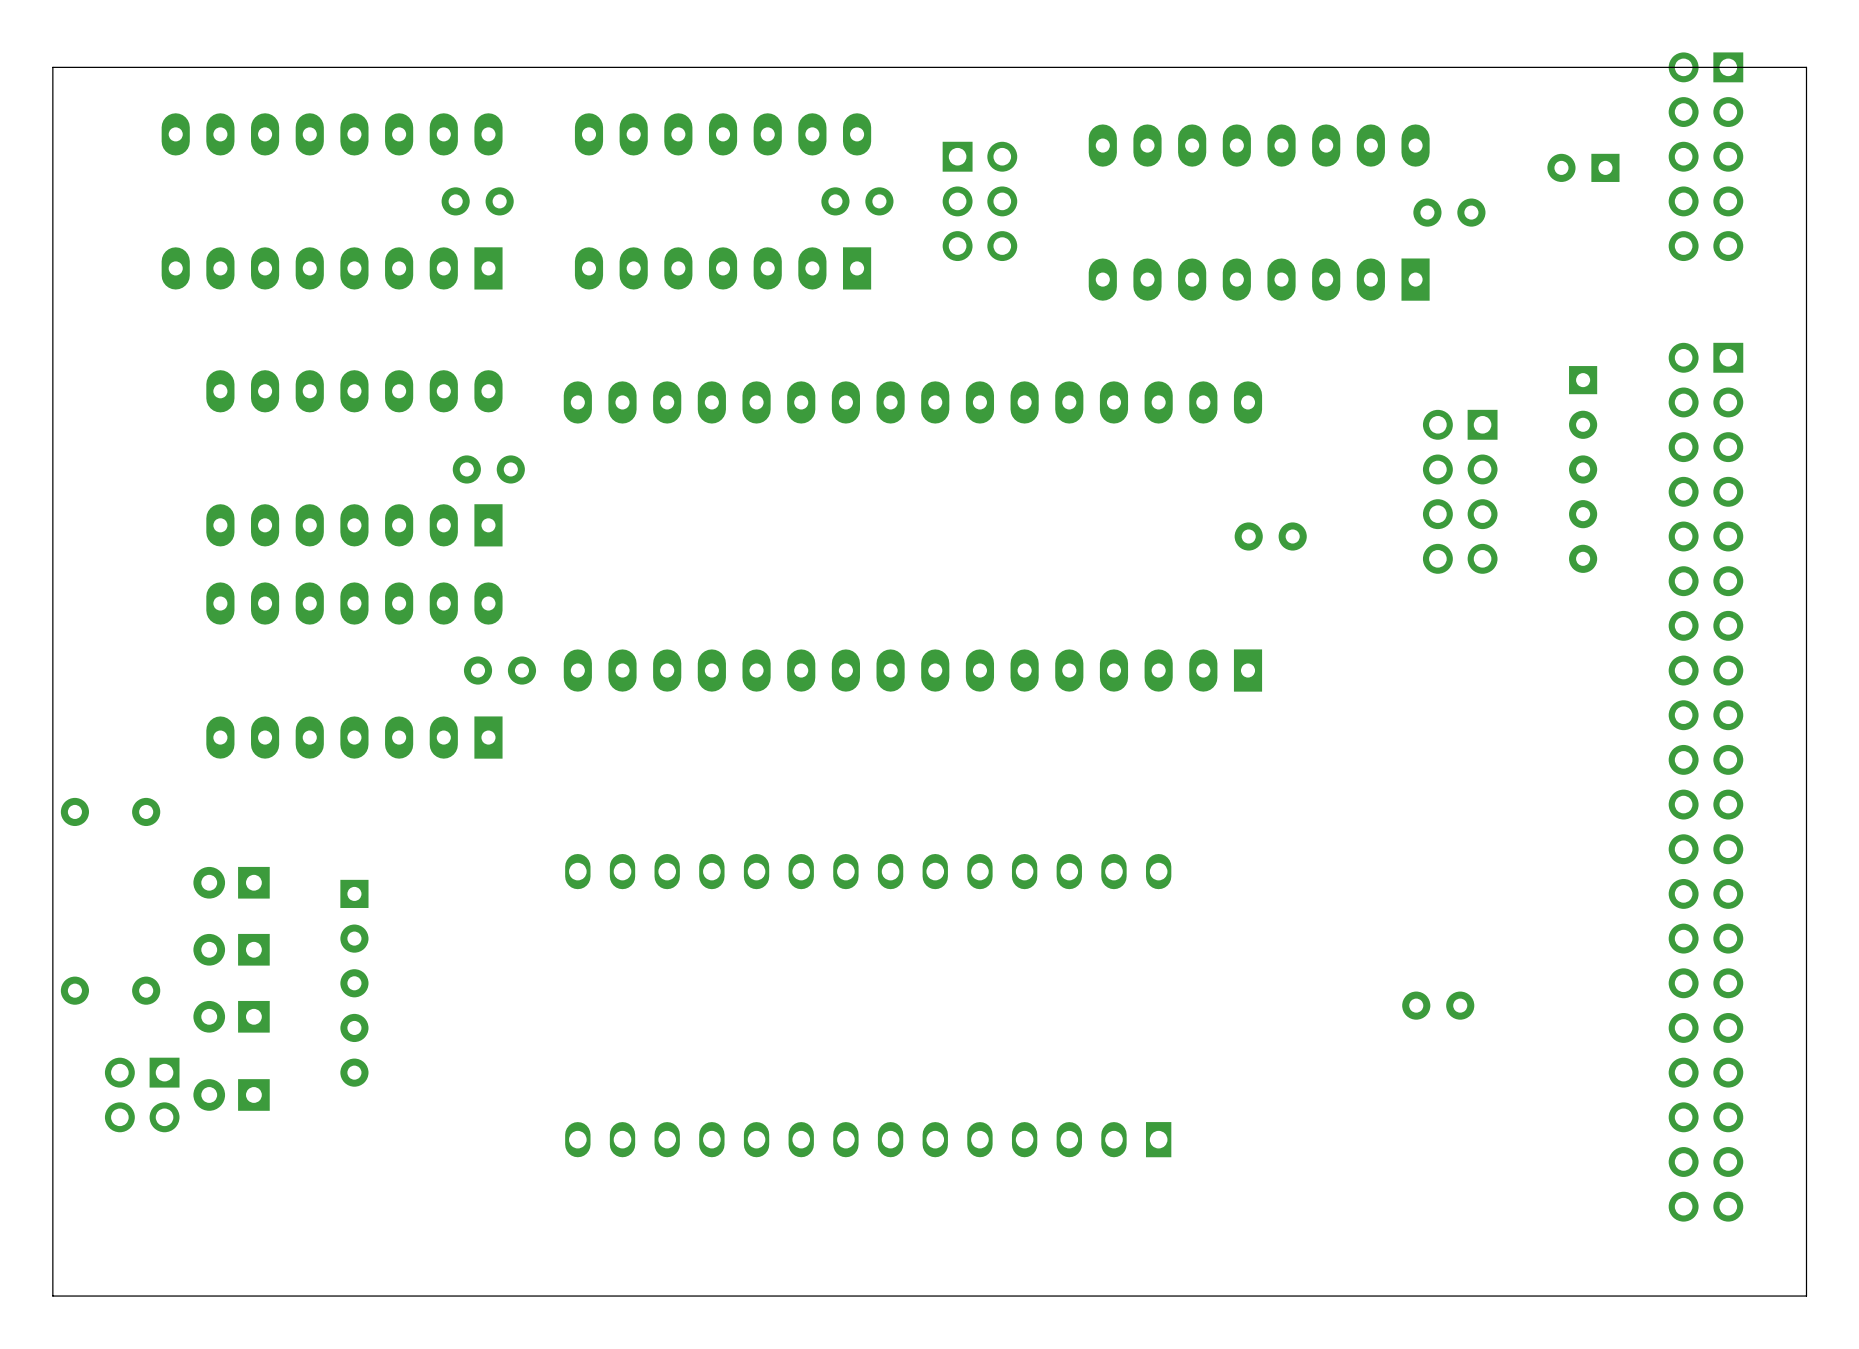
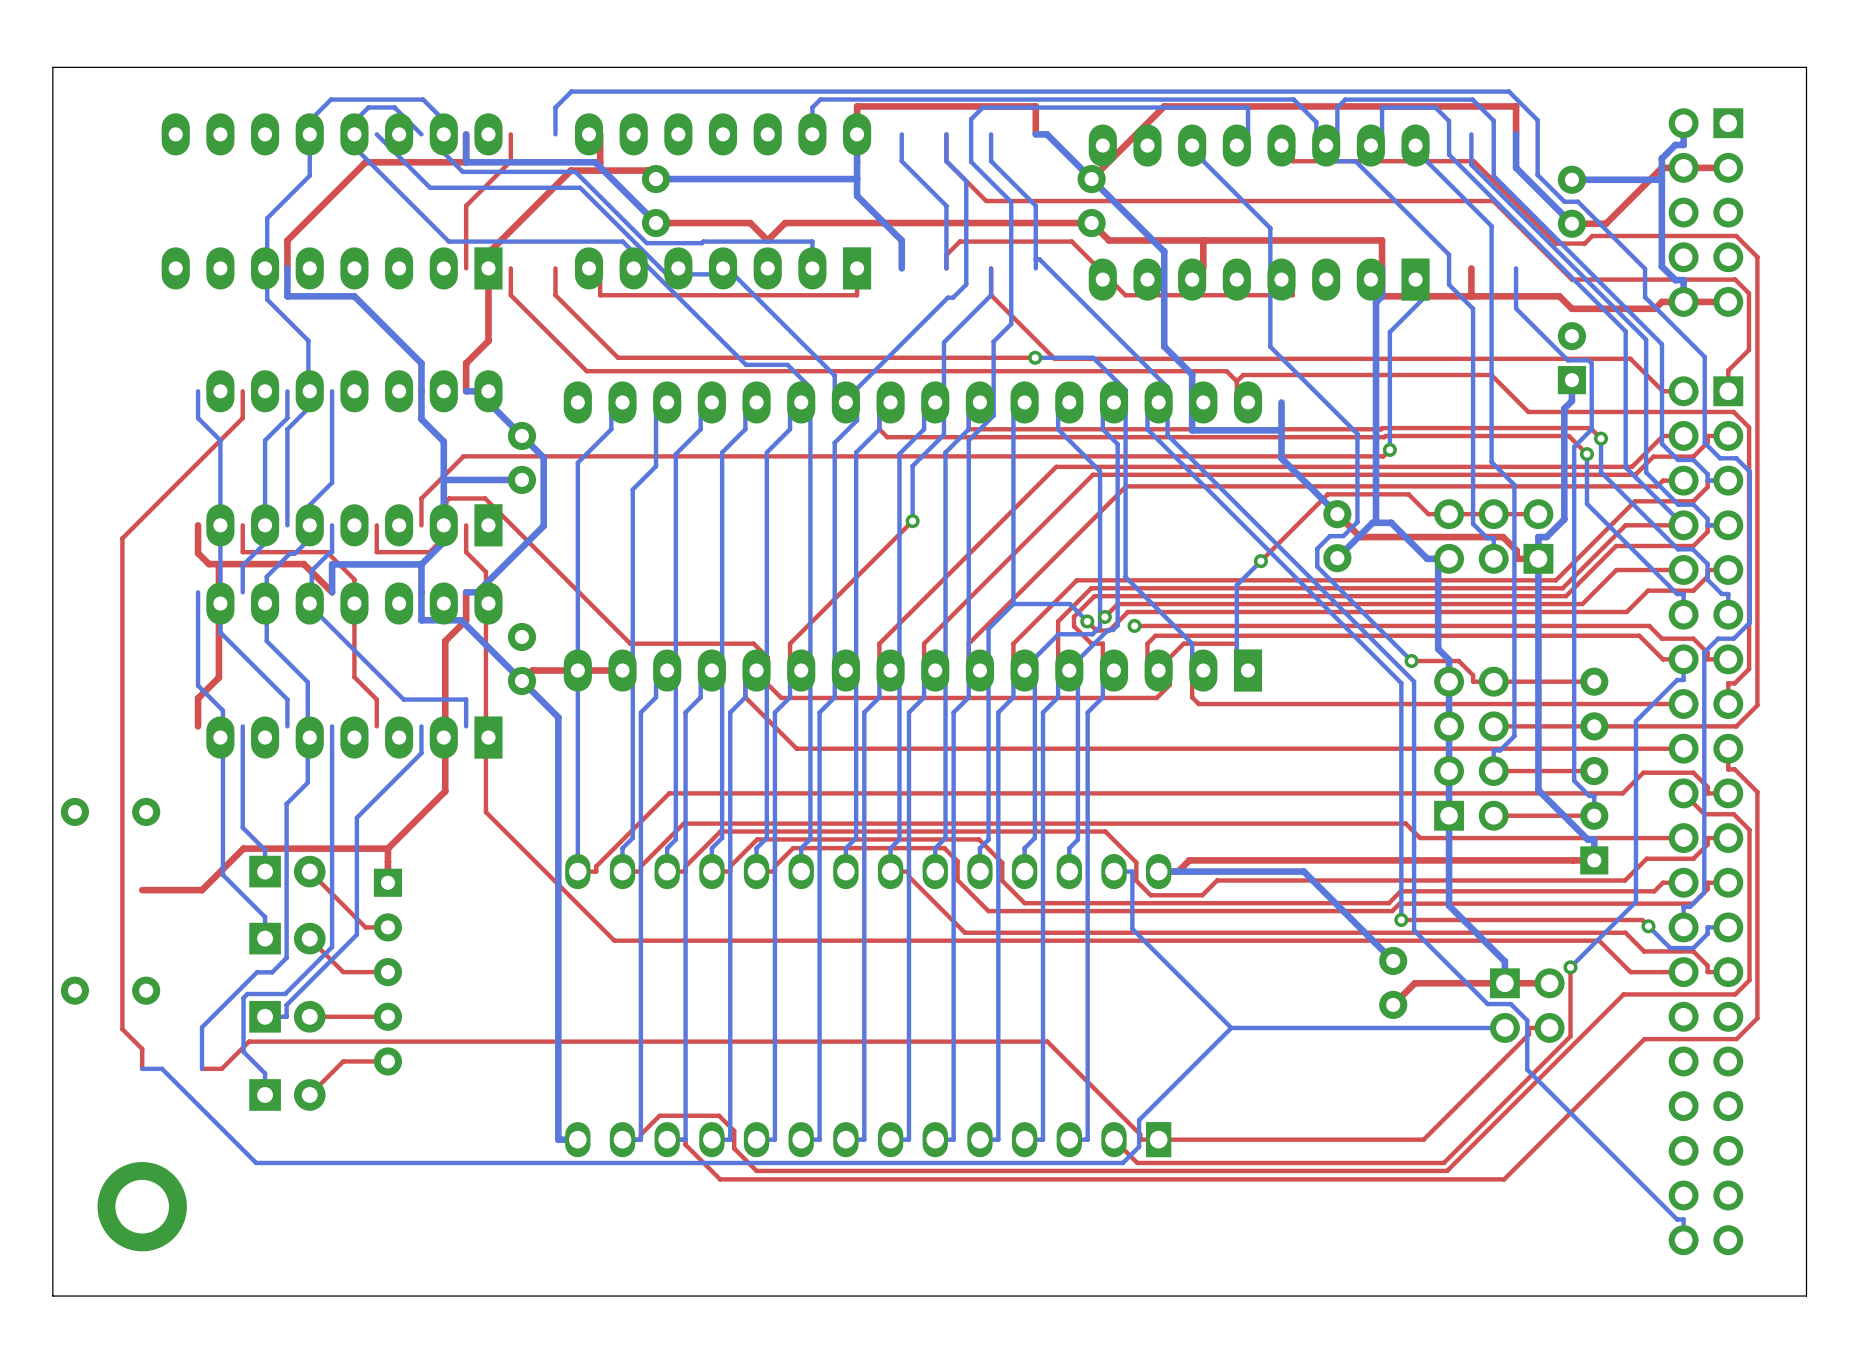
bottom track: none -> (1683, 123) (1683, 144) (1675, 144) (1661, 158) (1661, 266) (1675, 280) (1683, 280) (1683, 301)
bottom track: none -> (376, 134) (430, 187) (580, 187) (666, 274) (733, 274) (834, 375) (834, 402)
bottom track: none -> (421, 134) (394, 107) (368, 107) (356, 119) (356, 148) (448, 241) (622, 241) (746, 364) (787, 364) (810, 387) (810, 839) (801, 848) (801, 871)
top track: none -> (466, 134) (466, 162) (365, 162) (287, 240) (287, 268)
bottom track: none -> (466, 134) (466, 162) (595, 162) (656, 223)
top track: none -> (510, 134) (510, 161) (466, 205) (466, 268)
bottom track: none -> (555, 134) (555, 107) (571, 91) (1509, 91) (1537, 120) (1537, 174) (1564, 201) (1577, 201) (1645, 268) (1645, 297) (1704, 356) (1704, 442) (1720, 458) (1736, 458) (1749, 471) (1749, 622) (1733, 638) (1718, 638) (1704, 652) (1704, 892) (1690, 906) (1683, 906) (1683, 927)
top track: none -> (600, 134) (600, 170)
bottom track: none -> (812, 134) (812, 107) (820, 99) (1293, 99) (1316, 122) (1316, 148) (1329, 161) (1355, 161) (1449, 254) (1449, 284) (1473, 308) (1473, 523) (1487, 538) (1493, 538) (1493, 558)
bottom track: none -> (857, 134) (857, 195) (901, 240) (901, 268)
bottom track: none -> (901, 134) (901, 161) (946, 205) (946, 268)
top track: none -> (946, 134) (946, 161) (986, 201) (1493, 201) (1571, 279) (1735, 279) (1748, 293) (1748, 349) (1728, 370) (1728, 391)
bottom track: none -> (946, 134) (946, 161) (966, 181) (966, 284) (953, 297) (947, 297) (857, 388) (857, 420) (834, 442) (834, 697) (819, 712) (819, 1139) (801, 1139)
bottom track: none -> (991, 134) (991, 161) (1035, 205) (1035, 268)
top track: none -> (1035, 134) (1035, 106) (857, 106) (857, 134)
bottom track: none -> (1035, 134) (1046, 134) (1164, 251) (1164, 346) (1192, 374) (1192, 430) (1281, 430)
bottom track: none -> (1203, 134) (1203, 161) (1270, 228) (1270, 346) (1357, 433) (1357, 522) (1343, 536) (1329, 536) (1317, 548) (1317, 566) (1411, 661)
bottom track: none -> (1248, 134) (1248, 107) (982, 107) (971, 119) (971, 161) (1011, 201) (1011, 324) (993, 341) (993, 415) (968, 440) (968, 697) (953, 712) (953, 1139) (935, 1139)
top track: none -> (1292, 134) (1292, 161) (1473, 161) (1556, 243) (1584, 243) (1592, 235) (1736, 235) (1757, 257) (1757, 705) (1736, 726) (1493, 726)
bottom track: none -> (1337, 134) (1337, 107) (1345, 99) (1472, 99) (1493, 120) (1493, 176) (1661, 344) (1661, 443) (1678, 459) (1693, 459) (1707, 474) (1707, 480) (1728, 480)
bottom track: none -> (1382, 134) (1382, 107) (1435, 107) (1449, 121) (1449, 154) (1625, 331) (1625, 467) (1683, 525)
bottom track: none -> (1426, 134) (1426, 161) (1491, 226) (1491, 462) (1514, 484) (1514, 736) (1500, 750) (1493, 750) (1493, 771)
bottom track: none -> (1471, 134) (1471, 164) (1646, 339) (1646, 472) (1678, 504) (1693, 504) (1707, 518) (1707, 525) (1728, 525)
top track: none -> (1516, 134) (1516, 106) (1164, 106) (1091, 179)
bottom track: none -> (1516, 134) (1516, 167) (1571, 223)
part position: (1705, 156) -> (1705, 212)
part rotation: 0° (1583, 167) -> 90° clockwise (1571, 358)
part position: (1583, 167) -> (1571, 358)
top track: none -> (1728, 167) (1661, 167) (1606, 223) (1571, 223)
top track: none -> (656, 179) (647, 170) (570, 170) (488, 253) (488, 341) (466, 363) (466, 391)
bottom track: none -> (857, 179) (656, 179)
bottom track: none -> (1661, 179) (1571, 179)
part: (477, 201) -> none
part: none -> (656, 201)
part: (857, 201) -> none
part: (979, 201) -> none
part: none -> (1091, 201)
part rotation: 0° (1449, 212) -> 90° clockwise (1571, 201)
part position: (1449, 212) -> (1571, 201)
top track: none -> (656, 223) (750, 223) (767, 240) (785, 223) (1091, 223) (1109, 240) (1382, 240) (1382, 296) (1559, 296) (1571, 308) (1654, 308) (1661, 301) (1728, 301)
top track: none -> (1203, 240) (1203, 268)
bottom track: none -> (1035, 259) (1039, 259) (1167, 387) (1167, 435) (1414, 681) (1414, 930) (1487, 1004) (1510, 1004) (1527, 1020) (1527, 1069) (1677, 1219) (1683, 1219) (1683, 1240)
bottom track: none -> (287, 268) (287, 296) (354, 296) (421, 363) (421, 419) (443, 441) (443, 542) (421, 564)
top track: none -> (510, 268) (510, 295) (586, 371) (1226, 371) (1236, 381)
top track: none -> (555, 268) (555, 295) (618, 357) (1035, 357)
bottom track: none -> (812, 268) (812, 241) (646, 243) (575, 171) (462, 171) (442, 151) (442, 118) (423, 99) (331, 99) (309, 120) (309, 175) (267, 218) (267, 299) (308, 340) (308, 408) (287, 429) (287, 525)
top track: none -> (857, 268) (857, 295) (600, 295) (600, 268)
top track: none -> (991, 268) (991, 295) (1054, 358) (1630, 358) (1662, 391) (1683, 391)
bottom track: none -> (991, 268) (991, 295) (943, 342) (943, 434) (912, 466) (912, 521)
top track: none -> (1292, 268) (1292, 295) (1125, 295) (1071, 241) (959, 241) (946, 255) (946, 268)
bottom track: none -> (1382, 268) (1382, 296) (1376, 302) (1376, 522)
bottom track: none -> (1426, 268) (1426, 295) (1389, 332) (1389, 449)
top track: none -> (1471, 268) (1471, 296)
bottom track: none -> (1516, 268) (1516, 308) (1567, 360) (1588, 360) (1591, 363) (1591, 429) (1574, 446) (1574, 780) (1589, 795) (1594, 795) (1594, 815)
bottom track: none -> (1035, 357) (1093, 357) (1125, 390) (1125, 577) (1192, 643) (1192, 670)
via: none -> (1035, 357)
bottom track: none -> (1571, 380) (1571, 401) (1564, 408) (1564, 519) (1546, 537) (1538, 537) (1538, 790) (1587, 839) (1594, 839) (1594, 860)
top track: none -> (1236, 381) (1236, 402)
top track: none -> (1236, 381) (1243, 375) (1491, 375) (1528, 411) (1733, 411) (1749, 427) (1749, 668) (1734, 683) (1728, 683) (1728, 704)
bottom track: none -> (198, 391) (198, 418) (220, 440) (220, 632) (287, 699) (287, 726)
top track: none -> (242, 391) (242, 418) (122, 538) (122, 1029) (142, 1049) (142, 1068)
bottom track: none -> (287, 391) (287, 418) (265, 440) (265, 543) (242, 565) (242, 592)
bottom track: none -> (332, 391) (332, 482) (309, 505) (309, 538) (294, 553) (289, 553) (266, 576) (266, 641) (307, 682) (307, 782) (286, 803) (286, 957) (272, 972) (256, 972) (202, 1027) (202, 1068)
bottom track: none -> (466, 391) (477, 391) (543, 457) (543, 525) (477, 592) (466, 592)
bottom track: none -> (611, 402) (611, 429) (577, 462) (577, 871)
bottom track: none -> (656, 402) (656, 466) (632, 489) (632, 838) (622, 848) (622, 871)
bottom track: none -> (700, 402) (700, 429) (675, 454) (675, 839) (667, 848) (667, 871)
bottom track: none -> (745, 402) (745, 429) (722, 452) (722, 838) (711, 848) (711, 871)
bottom track: none -> (790, 402) (790, 429) (766, 452) (766, 838) (756, 848) (756, 871)
top track: none -> (879, 402) (879, 429) (887, 437) (1568, 436) (1586, 454)
bottom track: none -> (879, 402) (879, 429) (856, 452) (856, 838) (845, 848) (845, 871)
bottom track: none -> (924, 402) (924, 429) (899, 453) (899, 839) (890, 848) (890, 871)
top track: none -> (968, 402) (968, 429) (1590, 428) (1601, 438)
bottom track: none -> (968, 402) (968, 429) (945, 452) (945, 838) (935, 848) (935, 871)
bottom track: none -> (1013, 402) (1013, 604)
bottom track: none -> (1058, 402) (1058, 429) (1100, 471) (1100, 626) (1092, 634) (1058, 634) (1034, 657) (1034, 838) (1024, 848) (1024, 871)
bottom track: none -> (1102, 402) (1102, 429) (1117, 444) (1117, 625) (1112, 629) (1108, 629) (1077, 660) (1077, 839) (1069, 848) (1069, 871)
bottom track: none -> (1147, 402) (1147, 429) (1401, 683) (1401, 920)
bottom track: none -> (1281, 402) (1281, 458) (1337, 514)
top track: none -> (1683, 435) (1662, 435) (1632, 466) (1056, 466) (879, 643) (879, 670)
top track: none -> (1728, 435) (1707, 435) (1707, 442) (1693, 456) (1653, 456) (1635, 474) (1093, 474) (924, 643) (924, 670)
bottom track: none -> (1601, 438) (1601, 472) (1678, 549) (1692, 549) (1707, 564) (1707, 579) (1721, 594) (1728, 594) (1728, 614)
via: none -> (1601, 438)
top track: none -> (1389, 449) (1383, 456) (463, 456) (421, 498) (421, 525)
via: none -> (1389, 449)
bottom track: none -> (1586, 454) (1586, 503) (1677, 594) (1683, 594) (1683, 614)
via: none -> (1586, 454)
part rotation: 0° (488, 469) -> 90° clockwise (521, 457)
part rotation: 0° (1583, 469) -> 180° (1594, 771)
part position: (1583, 469) -> (1594, 771)
bottom track: none -> (521, 479) (443, 479)
top track: none -> (1683, 480) (1662, 480) (1657, 486) (1126, 486) (968, 643) (968, 670)
top track: none -> (1728, 480) (1707, 480) (1707, 487) (1693, 501) (1634, 501) (1555, 580) (1076, 580) (1013, 643) (1013, 670)
part rotation: 0° (1460, 491) -> 180° (1471, 748)
part position: (1460, 491) -> (1471, 748)
top track: none -> (1337, 514) (1360, 537) (1503, 537) (1516, 550) (1516, 558) (1538, 558)
top track: none -> (1538, 514) (1428, 514) (1408, 494) (1327, 494) (1260, 561)
top track: none -> (912, 521) (790, 643) (790, 670)
via: none -> (912, 521)
top track: none -> (198, 525) (198, 553) (208, 564) (303, 564) (332, 592)
top track: none -> (242, 525) (242, 552) (327, 552) (354, 579) (354, 677) (376, 699) (376, 726)
bottom track: none -> (332, 525) (332, 552) (311, 570) (311, 607) (403, 699) (466, 699) (466, 726)
top track: none -> (376, 525) (376, 552) (429, 552) (446, 535) (446, 501) (449, 498) (485, 498) (630, 643) (753, 643) (767, 657) (767, 684) (781, 697) (1156, 697) (1169, 684) (1169, 657) (1183, 643) (1236, 643) (1236, 670)
top track: none -> (466, 525) (466, 552) (485, 571) (485, 812) (614, 940) (1599, 940) (1630, 972) (1683, 972)
top track: none -> (1683, 525) (1625, 525) (1562, 588) (1091, 588) (1058, 621) (1058, 670)
top track: none -> (1728, 525) (1707, 525) (1707, 531) (1693, 545) (1616, 545) (1565, 596) (1094, 596) (1073, 616) (1073, 626) (1091, 643) (1102, 643) (1102, 670)
part rotation: 0° (1270, 536) -> 90° clockwise (1337, 536)
part position: (1270, 536) -> (1337, 536)
part: none -> (1493, 536)
bottom track: none -> (1337, 558) (1372, 522) (1391, 522) (1427, 558) (1449, 558)
bottom track: none -> (1438, 558) (1438, 649) (1449, 659) (1449, 905) (1504, 961) (1504, 983)
bottom track: none -> (1260, 561) (1236, 585) (1236, 670)
via: none -> (1260, 561)
top track: none -> (218, 564) (218, 677) (198, 698) (198, 726)
bottom track: none -> (421, 564) (421, 620) (461, 620) (558, 717) (558, 1139) (577, 1139)
bottom track: none -> (421, 564) (332, 564) (332, 592)
top track: none -> (1683, 570) (1616, 570) (1582, 604) (1117, 604) (1104, 616)
top track: none -> (1728, 570) (1707, 570) (1707, 576) (1693, 590) (1648, 590) (1626, 612) (1127, 612) (1109, 630) (1096, 630) (1087, 621)
bottom track: none -> (198, 592) (198, 685) (222, 710) (222, 874) (265, 917) (265, 938)
top track: none -> (466, 592) (466, 620) (445, 641) (445, 791) (387, 848)
bottom track: none -> (1013, 604) (988, 628) (988, 839) (979, 848) (979, 871)
bottom track: none -> (1013, 604) (1069, 604) (1087, 621)
via: none -> (1104, 616)
via: none -> (1087, 621)
top track: none -> (1134, 625) (1649, 625) (1661, 638) (1693, 638) (1707, 652) (1707, 659) (1728, 659)
via: none -> (1134, 625)
top track: none -> (1683, 659) (1662, 659) (1639, 635) (1155, 635) (1147, 643) (1147, 670)
bottom track: none -> (1683, 659) (1683, 680) (1677, 680) (1635, 721) (1635, 901) (1570, 967)
top track: none -> (1411, 661) (1458, 661) (1473, 675) (1473, 681) (1594, 681)
via: none -> (1411, 661)
part rotation: 0° (499, 670) -> 90° clockwise (521, 659)
top track: none -> (611, 670) (532, 670) (521, 680)
bottom track: none -> (656, 670) (656, 697) (640, 712) (640, 1139) (622, 1139)
bottom track: none -> (700, 670) (700, 697) (685, 712) (685, 1139) (667, 1139)
top track: none -> (745, 670) (745, 697) (796, 748) (1683, 748)
bottom track: none -> (745, 670) (745, 697) (730, 712) (730, 1139) (711, 1139)
bottom track: none -> (790, 670) (790, 697) (774, 712) (774, 1139) (756, 1139)
bottom track: none -> (879, 670) (879, 697) (864, 712) (864, 1139) (845, 1139)
bottom track: none -> (924, 670) (924, 697) (908, 712) (908, 1139) (890, 1139)
bottom track: none -> (1013, 670) (1013, 697) (998, 712) (998, 1139) (979, 1139)
bottom track: none -> (1058, 670) (1058, 697) (1043, 712) (1043, 1139) (1024, 1139)
bottom track: none -> (1102, 670) (1102, 697) (1087, 712) (1087, 1139) (1069, 1139)
top track: none -> (1192, 670) (1192, 697) (1198, 704) (1683, 704)
bottom track: none -> (242, 726) (242, 827) (265, 850) (265, 871)
bottom track: none -> (332, 726) (332, 947) (285, 994) (247, 994) (243, 997) (243, 1051) (265, 1073) (265, 1094)
bottom track: none -> (421, 726) (421, 753) (356, 817) (356, 934) (286, 1004) (286, 1016) (265, 1016)
top track: none -> (1728, 748) (1728, 769) (1734, 769) (1757, 792) (1757, 1018) (1736, 1039) (1644, 1039) (1504, 1179) (720, 1179) (685, 1144) (685, 1139) (667, 1139)
top track: none -> (1594, 771) (1493, 771)
part position: (1705, 782) -> (1705, 815)
top track: none -> (1683, 793) (1704, 814) (1733, 814) (1749, 829) (1749, 980) (1735, 994) (1623, 994) (1447, 1170) (756, 1170) (734, 1148) (734, 1130) (719, 1115) (659, 1115) (640, 1134) (640, 1139) (622, 1139)
top track: none -> (1728, 793) (1707, 793) (1707, 786) (1693, 772) (1643, 772) (1622, 793) (669, 793) (596, 866) (596, 871) (577, 871)
top track: none -> (1594, 815) (1493, 815)
top track: none -> (1683, 838) (1420, 838) (1405, 823) (683, 823) (640, 866) (640, 871) (622, 871)
top track: none -> (1728, 838) (1707, 838) (1707, 844) (1693, 858) (1646, 858) (1624, 880) (1217, 880) (1202, 895) (1150, 895) (1136, 880) (1136, 862) (1105, 831) (720, 831) (685, 866) (685, 871) (667, 871)
top track: none -> (387, 848) (387, 882)
top track: none -> (387, 848) (243, 848) (202, 890) (142, 890)
top track: none -> (1594, 860) (1189, 860) (1178, 871) (1158, 871)
part: none -> (287, 871)
top track: none -> (309, 871) (365, 927) (387, 927)
top track: none -> (711, 871) (730, 871) (730, 866) (757, 839) (978, 839) (1002, 862) (1002, 880) (1024, 903) (1388, 903) (1400, 891) (1654, 891) (1662, 882) (1683, 882)
top track: none -> (756, 871) (774, 871) (774, 866) (793, 848) (944, 848) (957, 861) (957, 880) (988, 911) (1392, 911) (1399, 903) (1693, 903) (1707, 889) (1707, 882) (1728, 882)
top track: none -> (890, 871) (908, 871) (908, 876) (964, 932) (1625, 932) (1644, 951) (1693, 951) (1707, 965) (1707, 972) (1728, 972)
bottom track: none -> (1113, 871) (1132, 871) (1132, 928) (1231, 1027)
bottom track: none -> (1158, 871) (1303, 871) (1393, 960)
part: (231, 882) -> none
top track: none -> (1401, 920) (1642, 920) (1648, 926)
via: none -> (1401, 920)
bottom track: none -> (1648, 926) (1670, 948) (1693, 948) (1707, 933) (1707, 927) (1728, 927)
via: none -> (1648, 926)
part: none -> (287, 938)
top track: none -> (309, 938) (343, 972) (387, 972)
part: (231, 949) -> none
top track: none -> (1570, 967) (1570, 1036) (1443, 1162) (1137, 1162) (1113, 1139)
via: none -> (1570, 967)
part position: (354, 983) -> (387, 972)
top track: none -> (1549, 983) (1414, 983) (1393, 1004)
part rotation: 0° (1438, 1005) -> 90° clockwise (1393, 982)
part position: (1438, 1005) -> (1393, 982)
part: none -> (1527, 1005)
part: (231, 1016) -> none
part: none -> (287, 1016)
top track: none -> (387, 1016) (309, 1016)
bottom track: none -> (1231, 1027) (1139, 1120) (1139, 1146) (1122, 1163) (256, 1163) (162, 1068) (142, 1068)
bottom track: none -> (1504, 1027) (1231, 1027)
top track: none -> (1549, 1027) (1528, 1027) (1528, 1034) (1423, 1139) (1140, 1139) (1140, 1134) (1047, 1041) (249, 1041) (221, 1068) (202, 1068)
top track: none -> (387, 1061) (343, 1061) (309, 1094)
part: (142, 1094) -> none
part: (231, 1094) -> none
part: none -> (287, 1094)
via: none -> (142, 1206)

